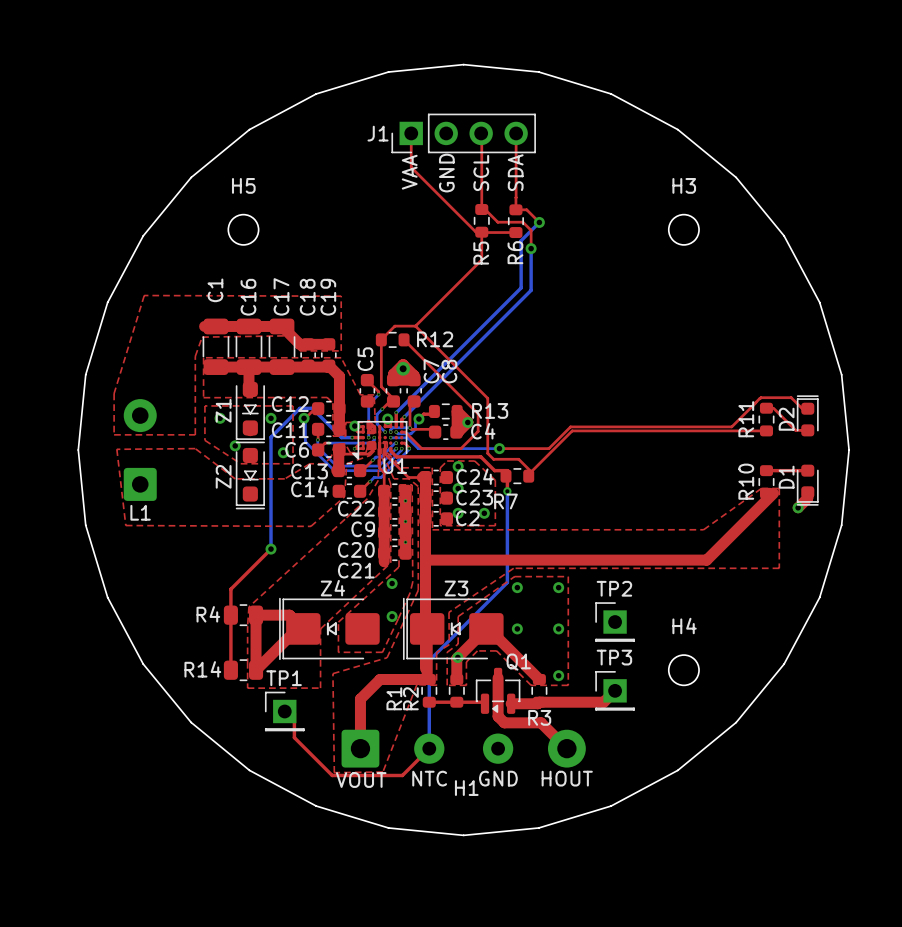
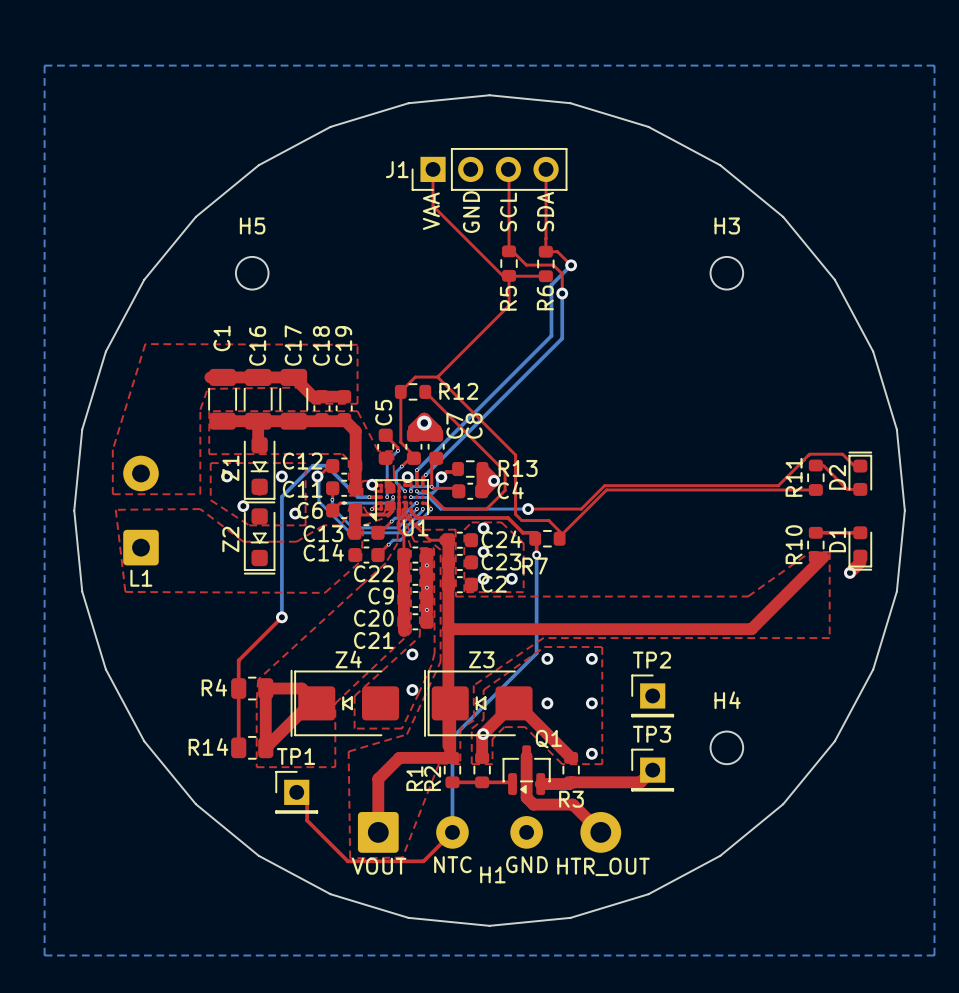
bottom zone outline: none -> (44, 65) (934, 65) (934, 955) (44, 955) (44, 65)
text: HOUT (567, 778) -> HTR_OUT (603, 866)

